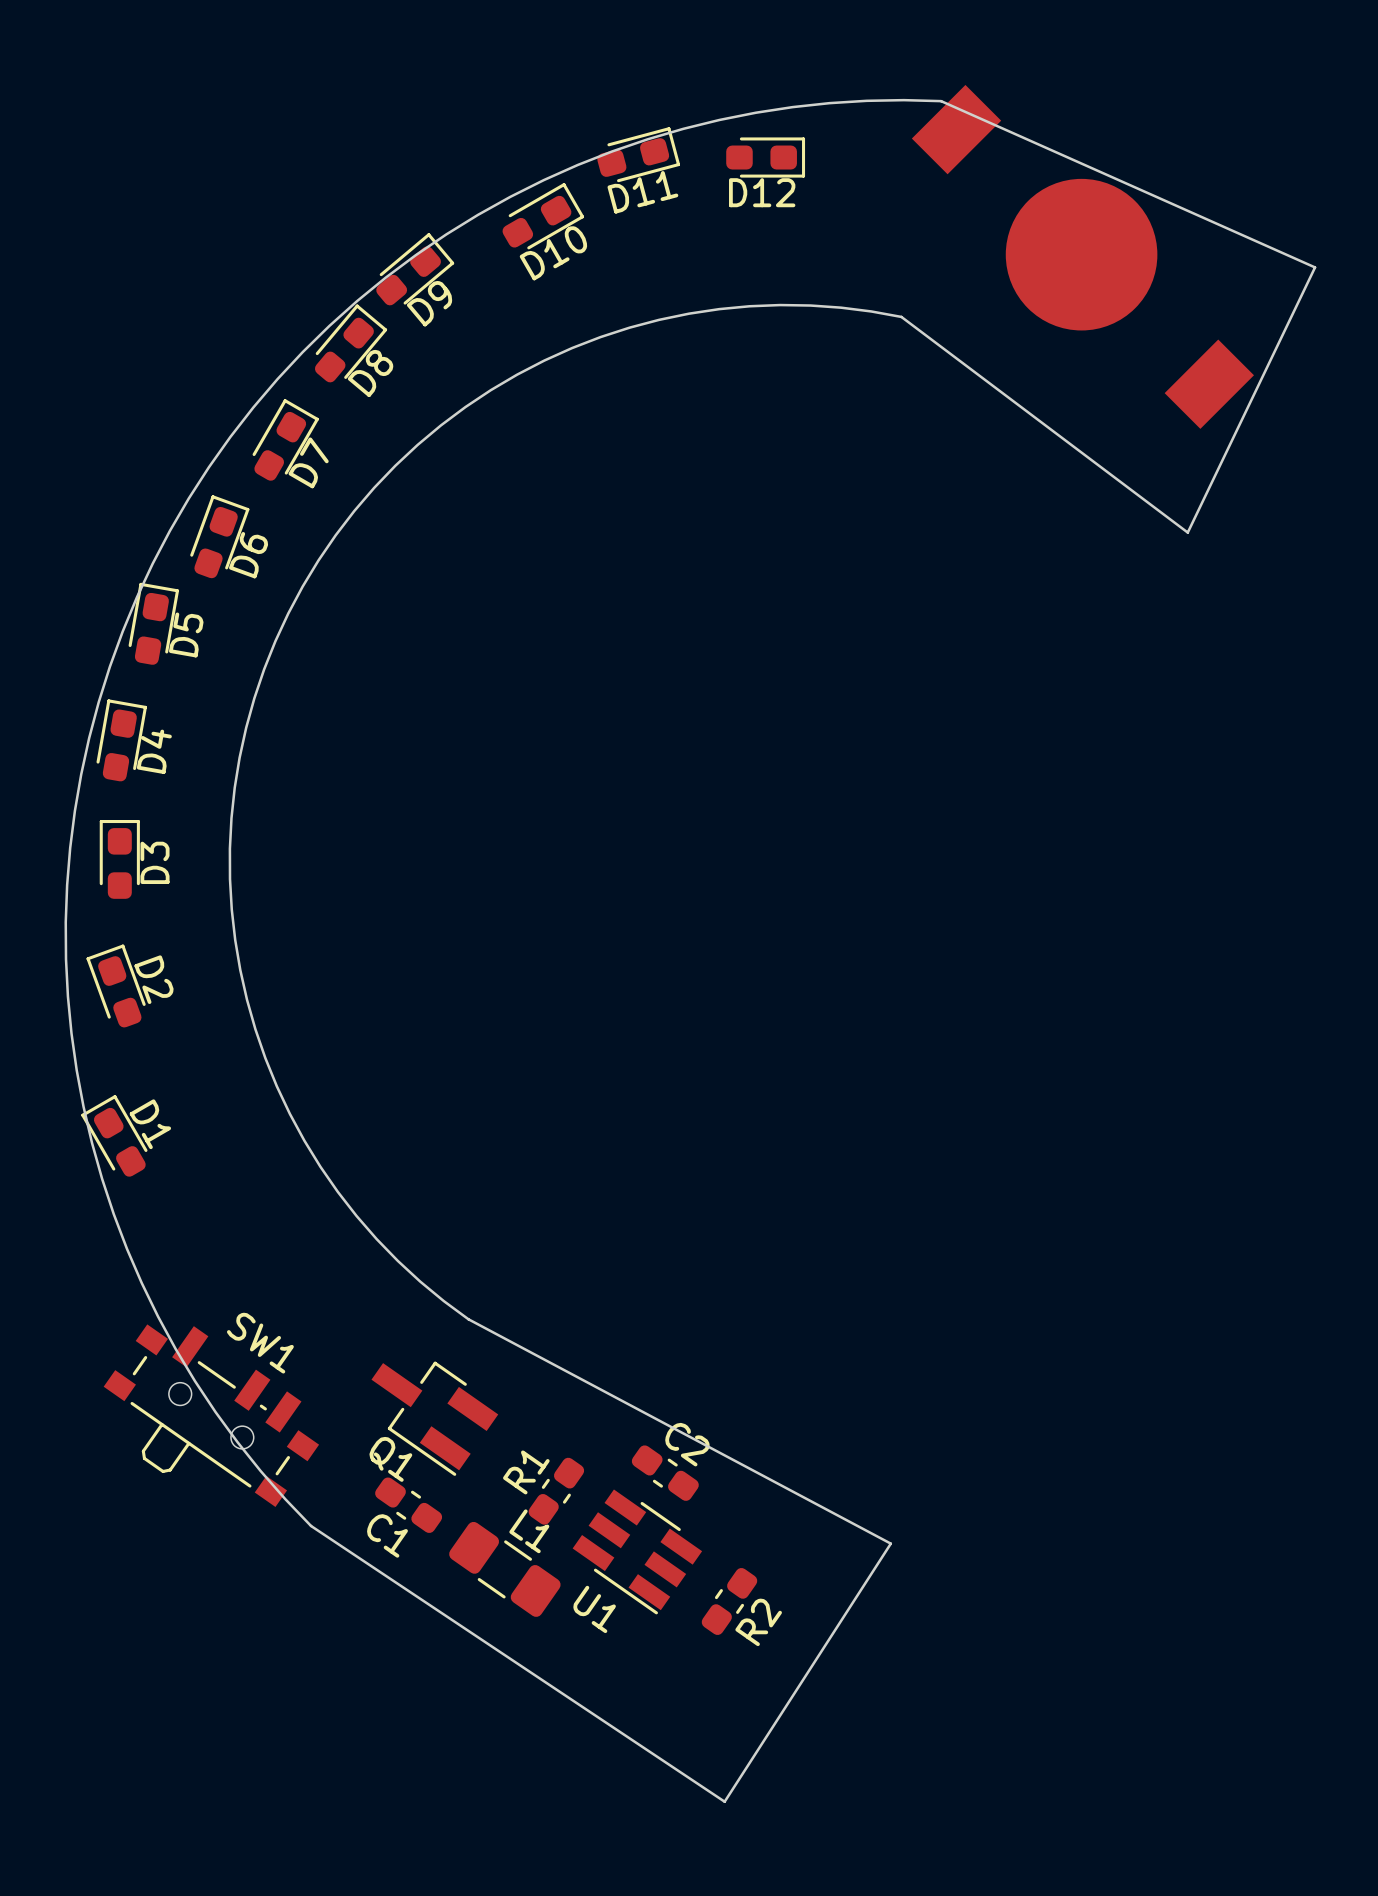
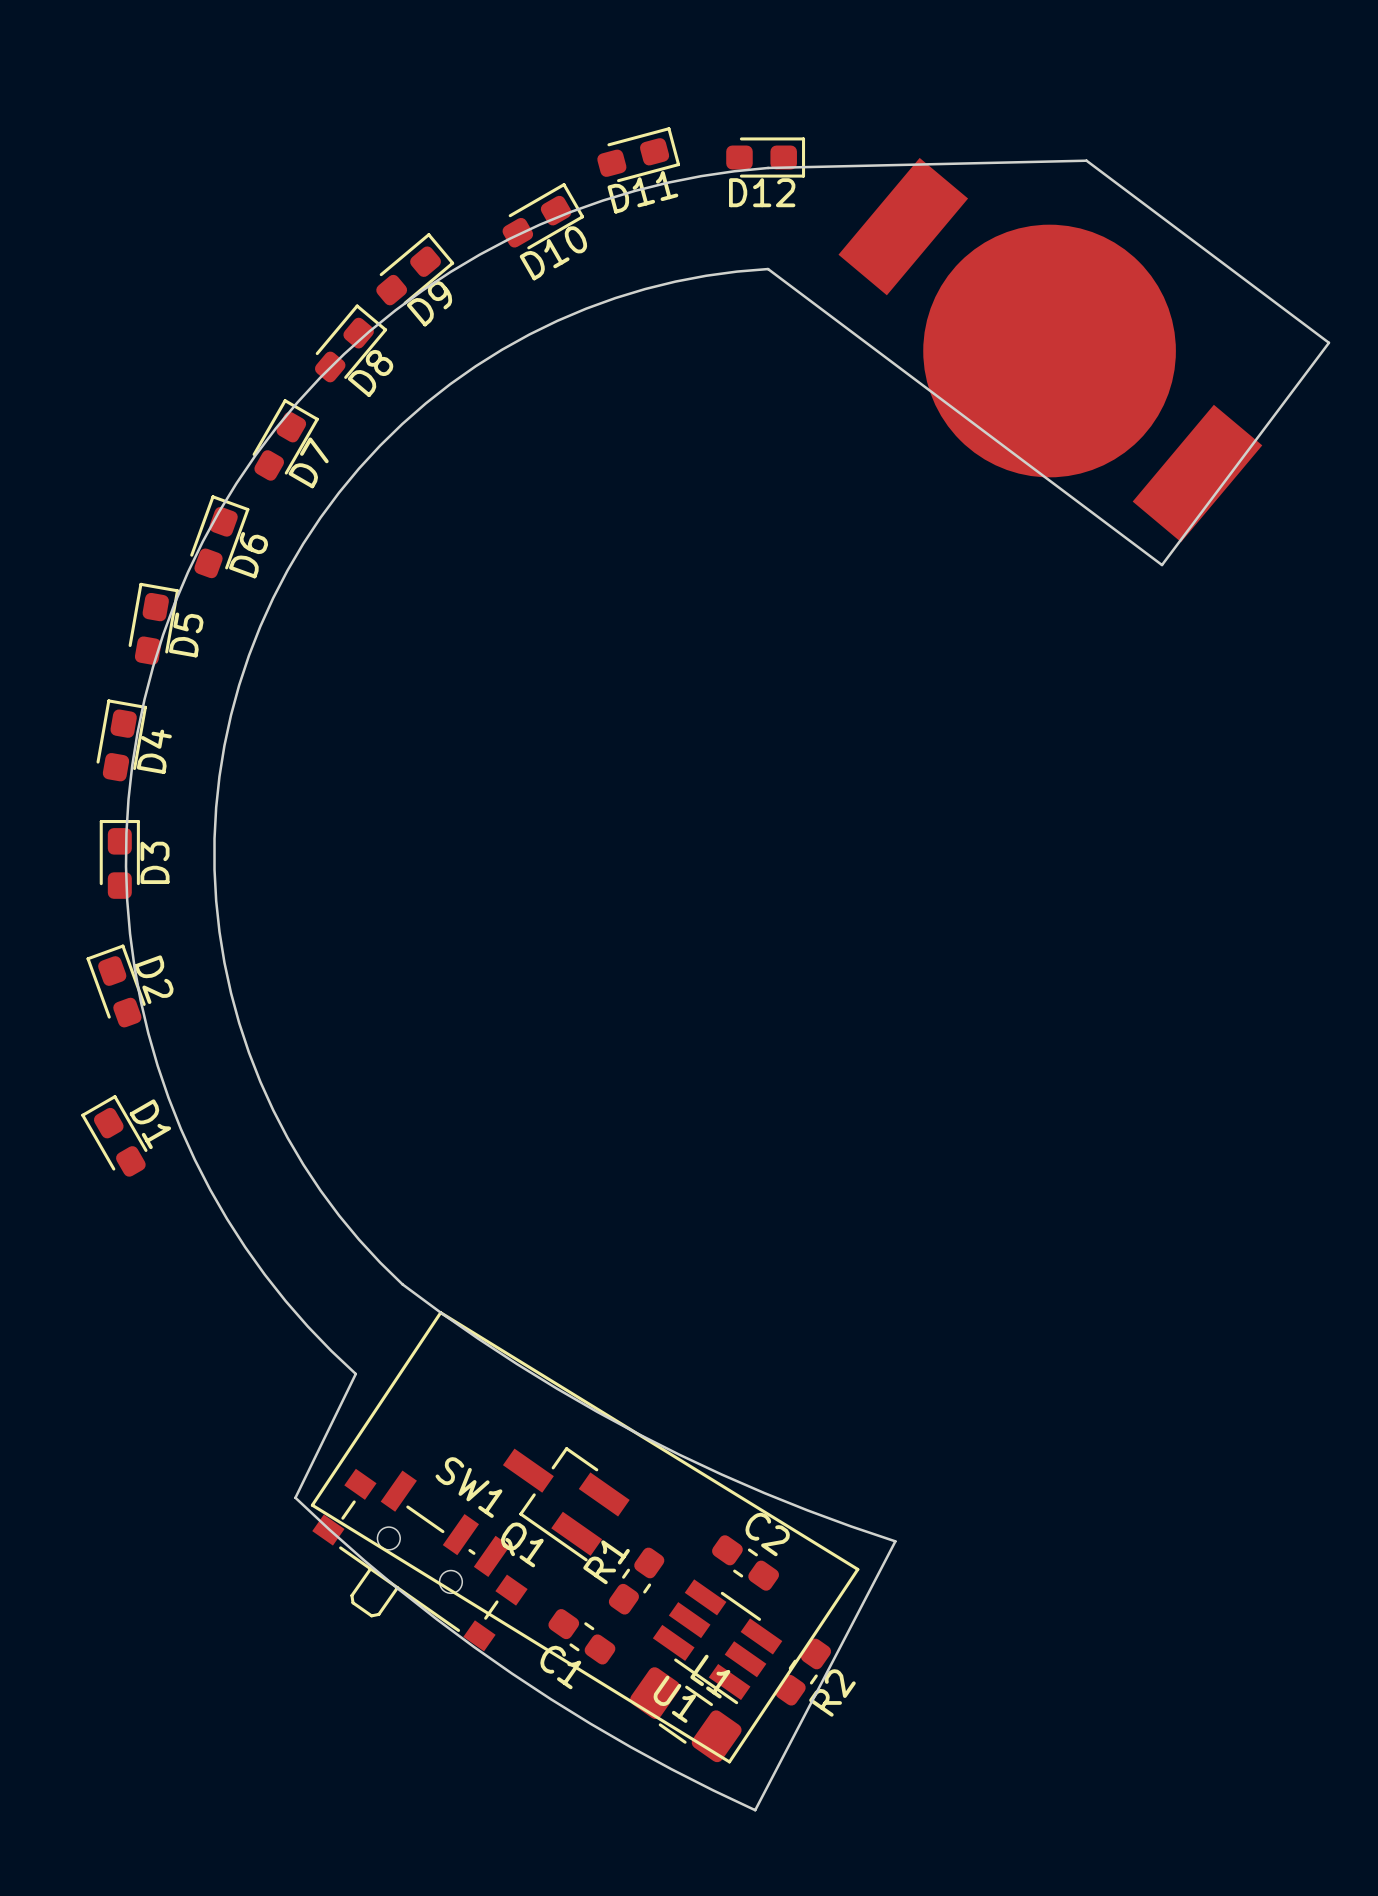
board edge: (941, 101) (1315, 267) (1187, 532) (901, 316) (841, 307) (780, 305) (749, 306) (689, 313) (629, 327) (572, 348) (517, 374) (490, 390) (441, 425) (417, 444) (374, 487) (335, 535) (302, 586) (288, 613) (275, 641) (254, 698) (246, 727) (234, 787) (229, 848) (231, 909) (240, 970) (255, 1029) (265, 1058) (289, 1113) (320, 1166) (356, 1215) (376, 1239) (420, 1281) (468, 1319) (890, 1543) (724, 1801) (311, 1525) (260, 1471) (215, 1412) (175, 1349) (141, 1283) (113, 1214) (92, 1143) (76, 1070) (67, 996) (65, 922) (70, 847) (81, 774) (98, 702) (122, 631) (152, 563) (188, 498) (230, 436) (277, 379) (329, 325) (357, 301) (415, 255) (478, 214) (543, 180) (612, 151) (683, 128) (719, 119) (792, 107) (866, 100) (941, 101) -> (1086, 160) (768, 167) (701, 176) (635, 190) (571, 211) (509, 238) (450, 271) (395, 310) (369, 331) (320, 377) (275, 428) (236, 483) (202, 541) (174, 603) (153, 666) (137, 732) (132, 765) (126, 832) (127, 900) (130, 933) (140, 1000) (157, 1065) (180, 1128) (210, 1189) (227, 1218) (264, 1274) (285, 1301) (307, 1326) (355, 1373) (295, 1497) (400, 1590) (512, 1673) (630, 1747) (755, 1810) (895, 1541) (807, 1510) (721, 1474) (597, 1411) (517, 1364) (439, 1312) (402, 1284) (359, 1239) (320, 1190) (287, 1137) (260, 1081) (239, 1023) (224, 962) (216, 900) (214, 838) (219, 776) (224, 745) (239, 685) (248, 655) (260, 626) (287, 570) (320, 517) (339, 492) (380, 445) (425, 403) (450, 384) (502, 349) (529, 334) (586, 308) (615, 298) (675, 281) (737, 271) (768, 269) (1162, 565) (1328, 342) (1086, 160)
part: (1082, 256) -> none
part: none -> (1050, 350)
line: none -> (440, 1312) (312, 1505) (729, 1761) (857, 1569) (440, 1312)
SW1 position: (211, 1415) -> (419, 1560)
Q1 position: (434, 1418) -> (566, 1504)
C2 position: (665, 1473) -> (745, 1562)
R1 position: (556, 1491) -> (636, 1581)
C1 position: (408, 1505) -> (581, 1636)
U1 position: (637, 1551) -> (717, 1641)
L1 position: (504, 1569) -> (685, 1714)
R2 position: (729, 1601) -> (803, 1672)

